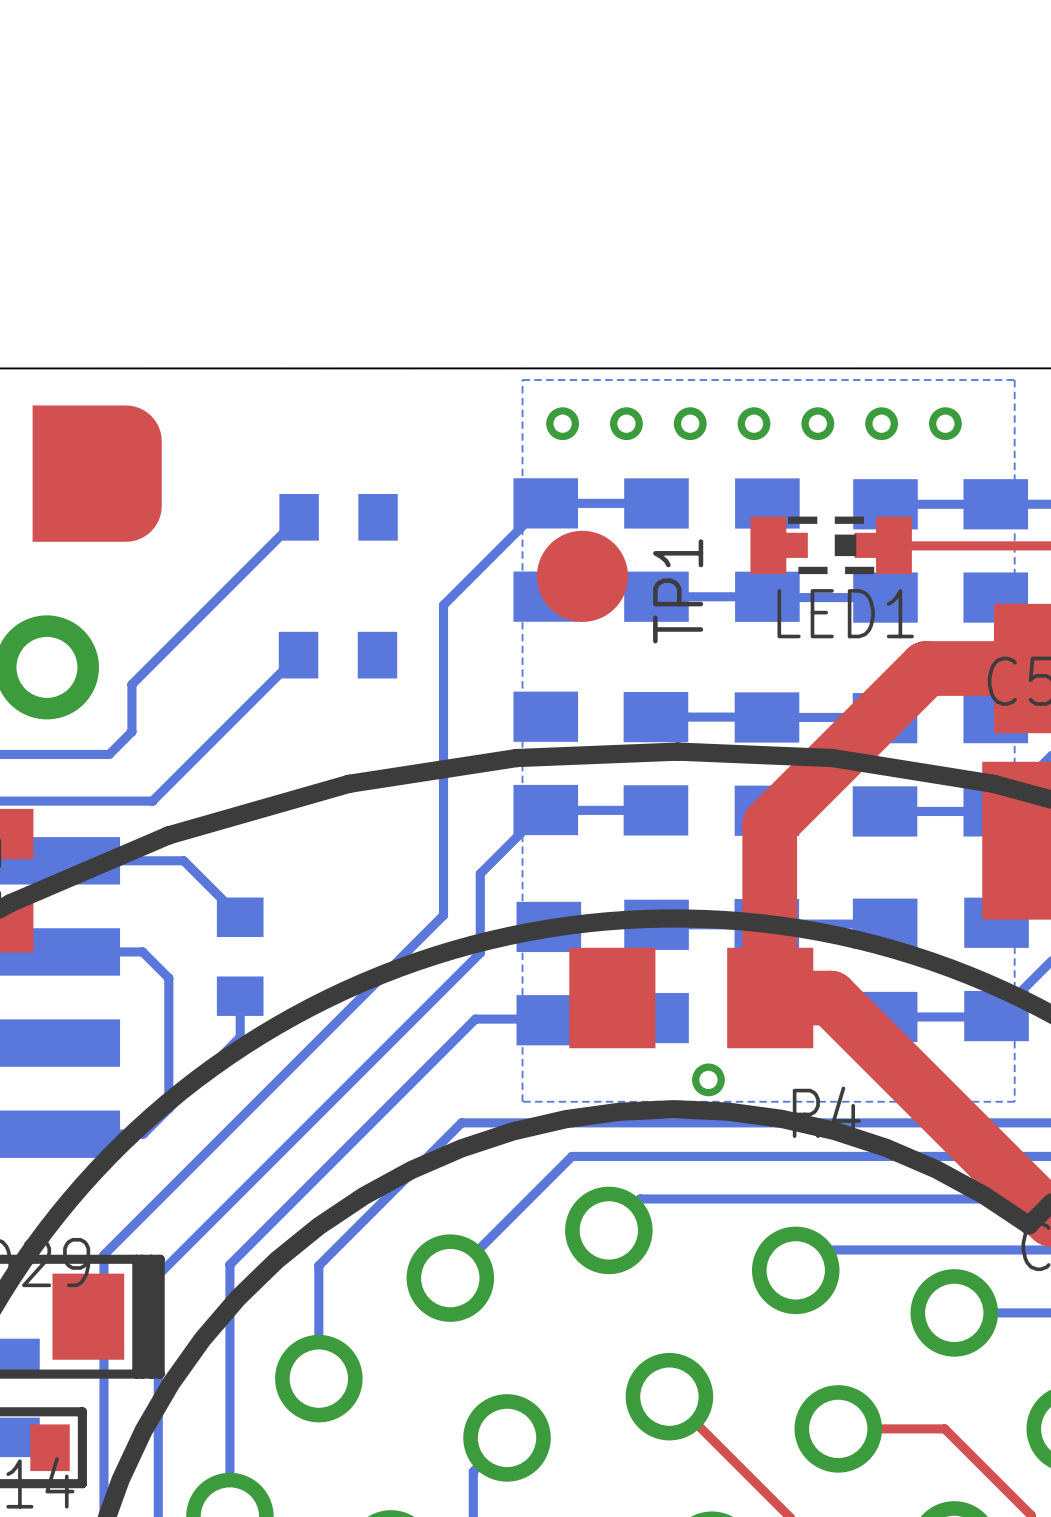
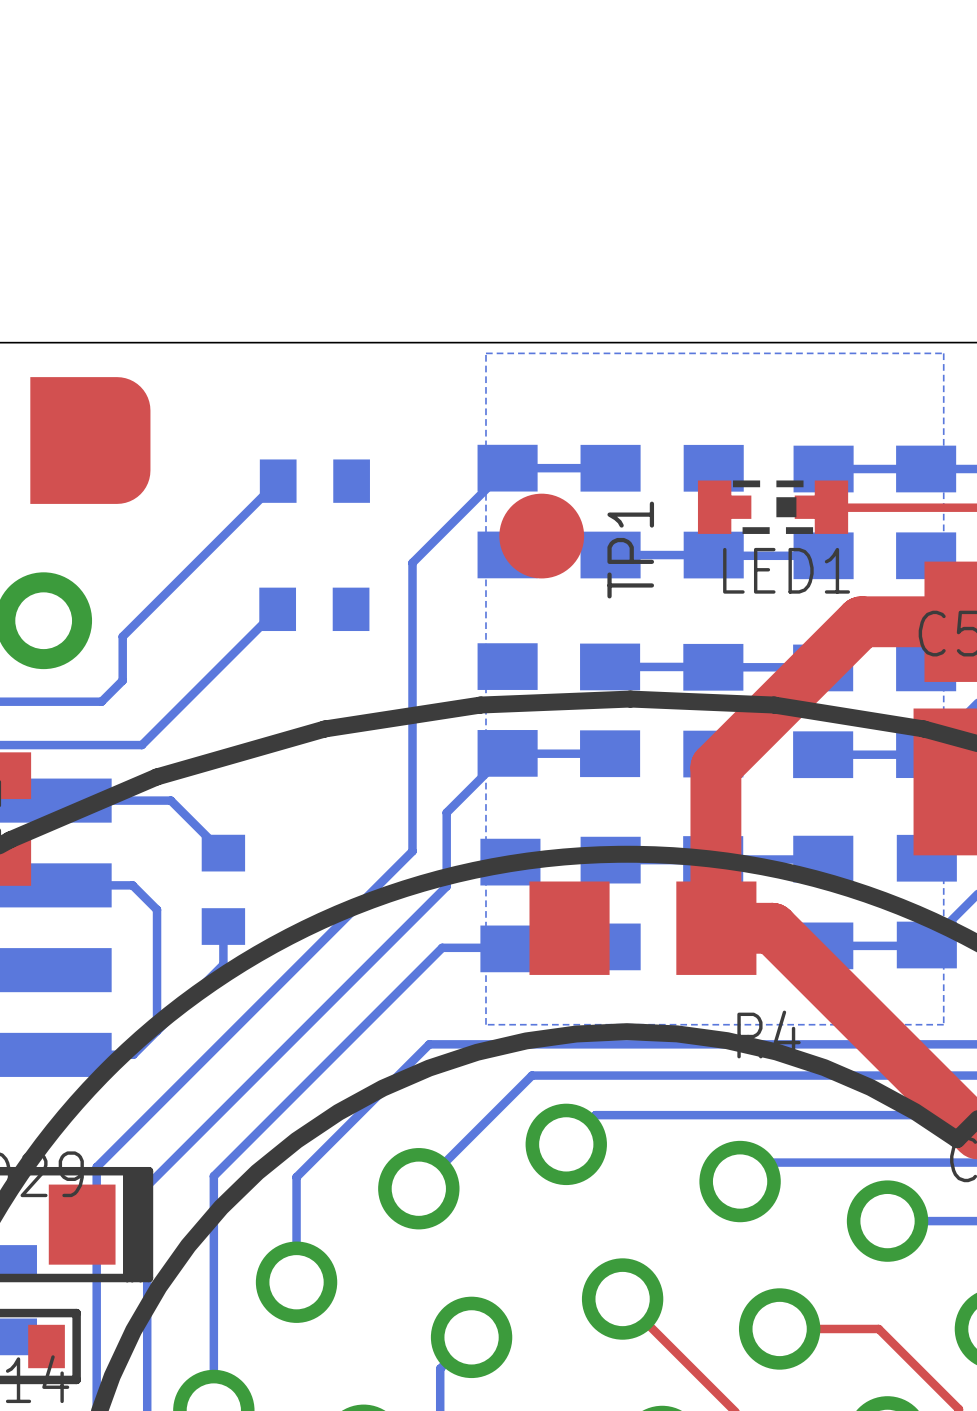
via: (562, 423) -> none
via: (626, 423) -> none
via: (690, 423) -> none
via: (754, 423) -> none
via: (817, 423) -> none
via: (881, 423) -> none
via: (945, 423) -> none
via: (708, 1079) -> none

